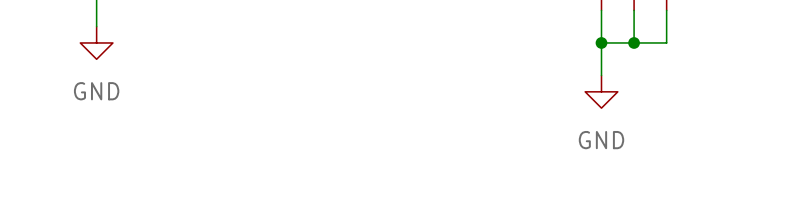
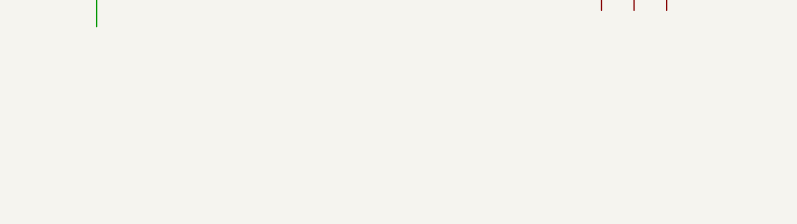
wire: (601, 10) (601, 75) -> none
wire: (634, 10) (634, 42) -> none
wire: (666, 10) (666, 42) (601, 42) -> none
power symbol: GND (96, 42) -> none
junction: (601, 42) -> none
junction: (634, 42) -> none
power symbol: GND (601, 91) -> none

